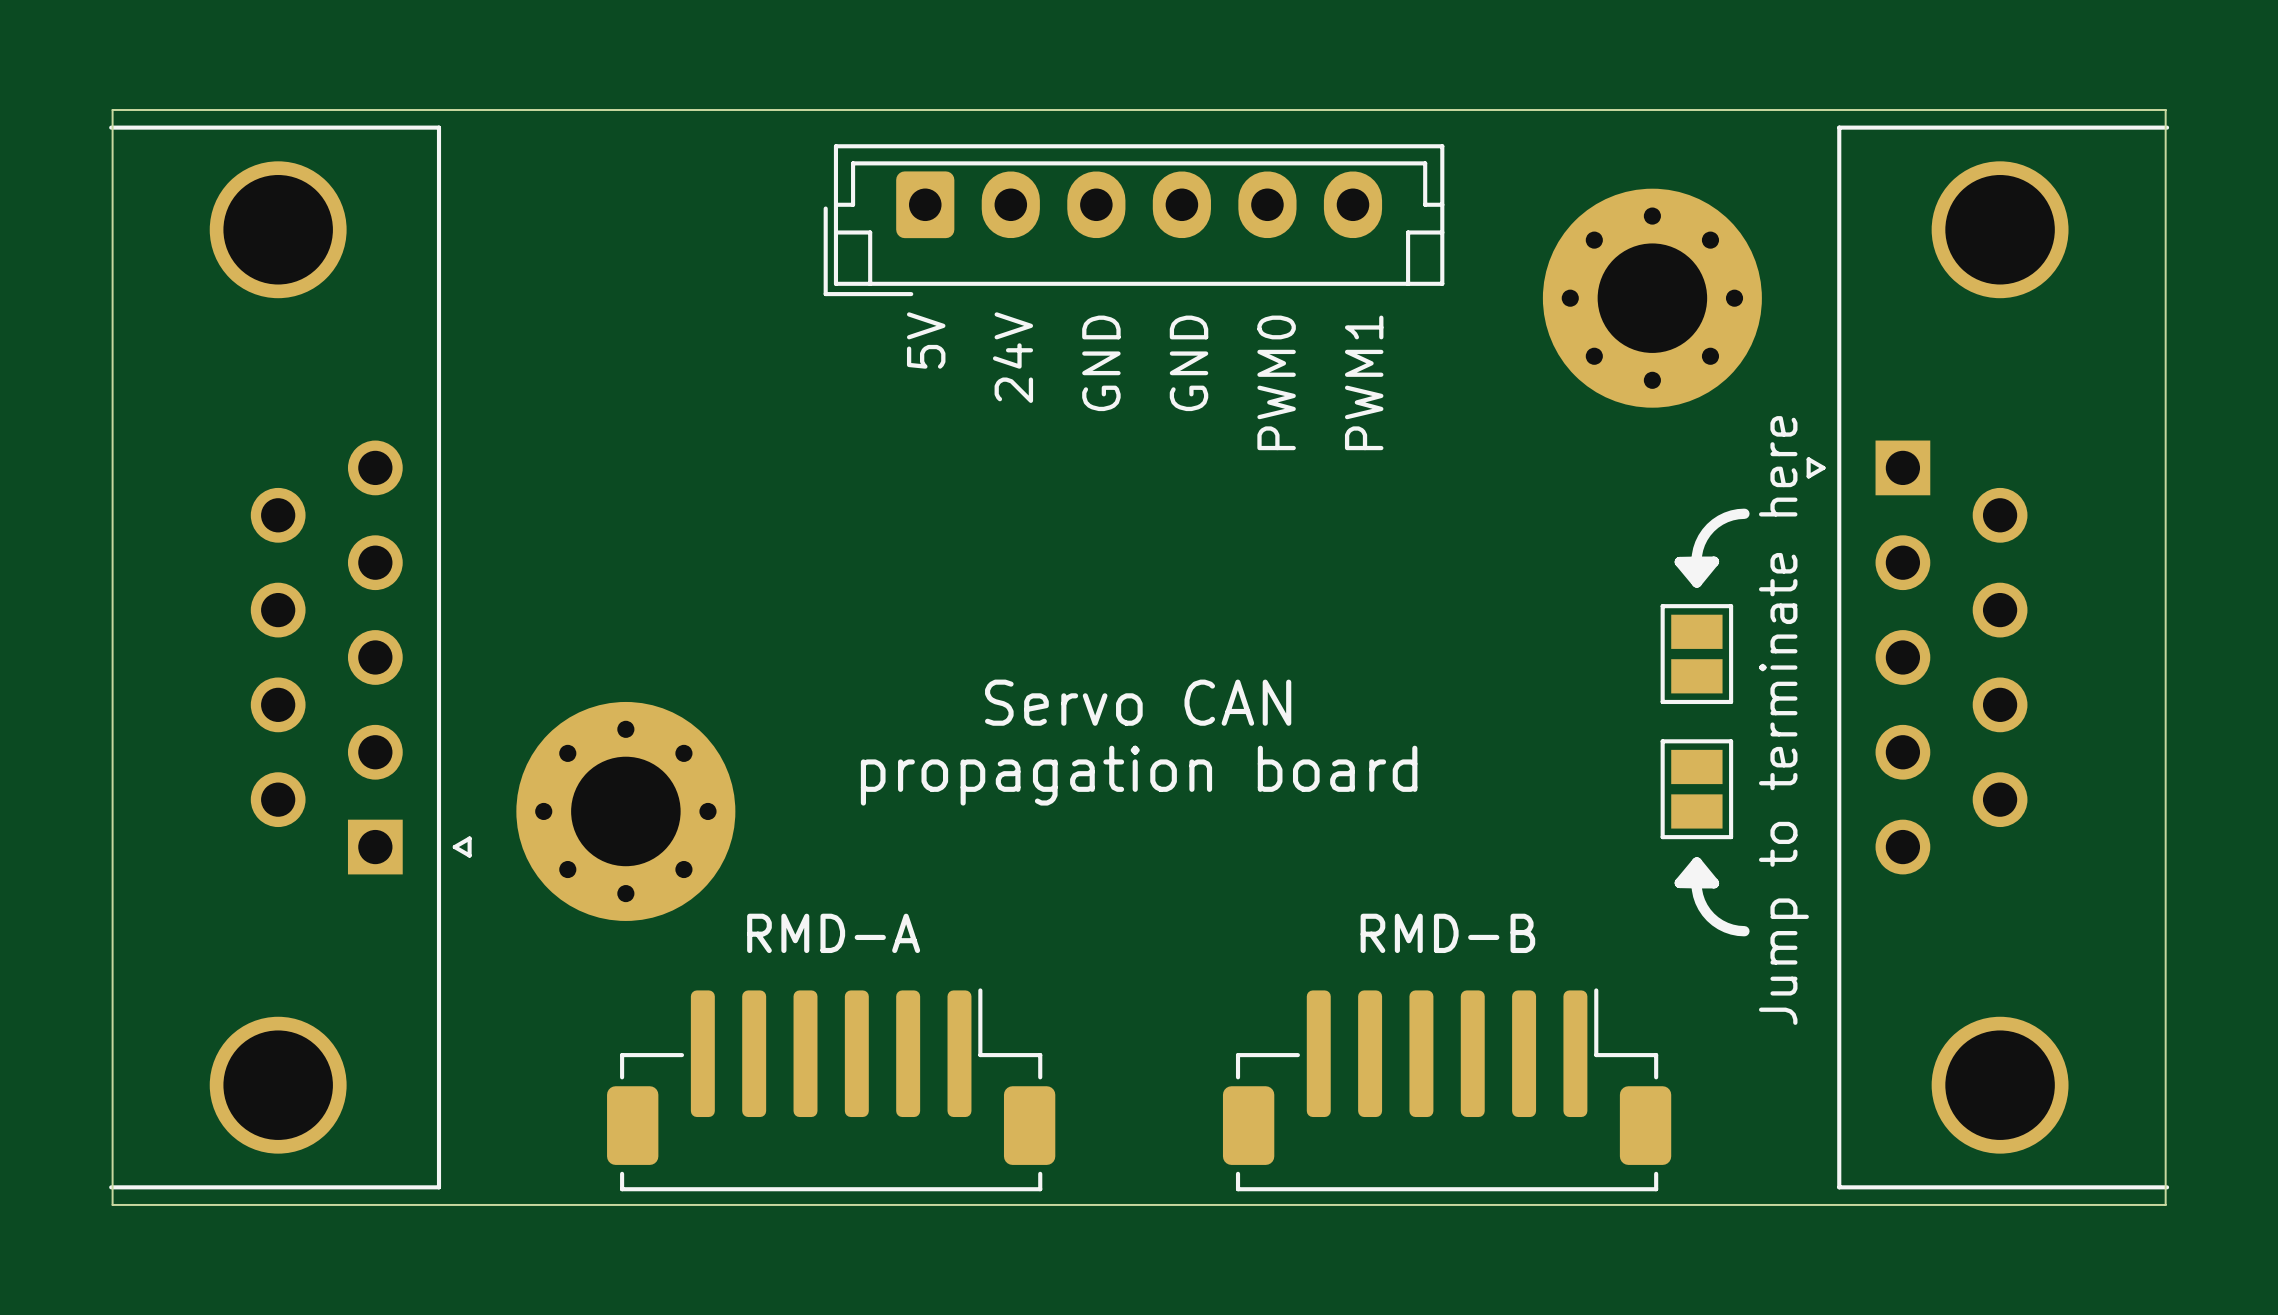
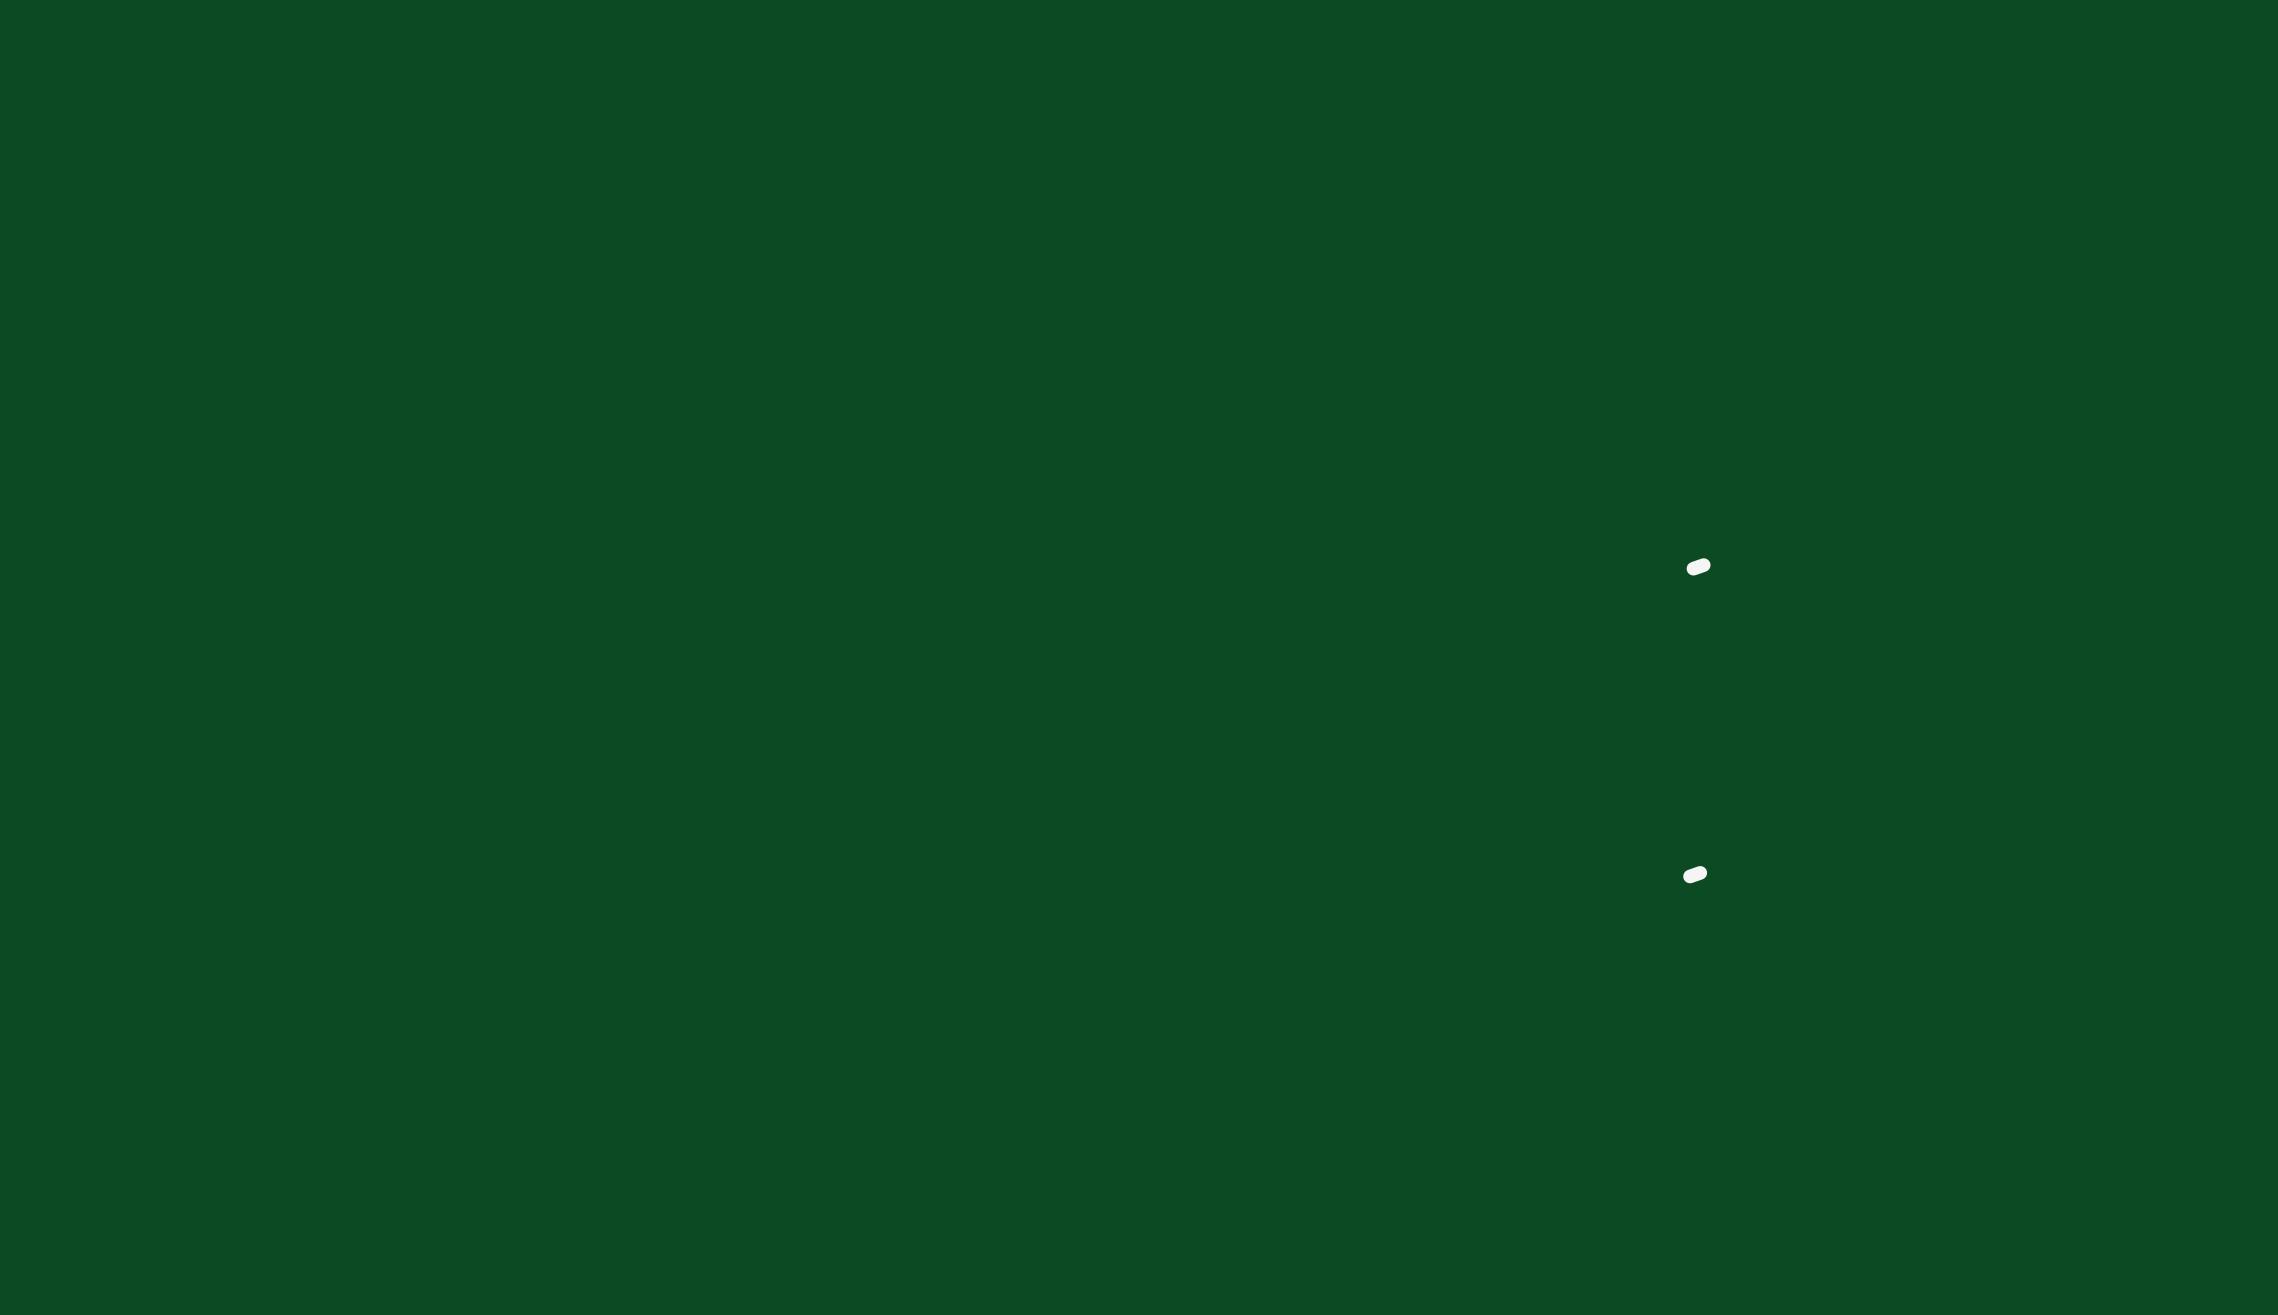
board edge: (112, 109) (2165, 109) (2165, 1204) (112, 1204) (112, 109) -> none
part: (1133, 220) -> none
part: (1652, 298) -> none
text: 5V (926, 340) -> none
text: 24V (1012, 357) -> none
text: GND (1101, 363) -> none
text: GND (1189, 363) -> none
text: PWM0 (1276, 382) -> none
text: PWM1 (1364, 382) -> none
line: (1744, 513) (1726, 517) (1710, 527) (1700, 543) (1696, 561) -> none
line: (1696, 561) (1679, 562) (1696, 582) (1713, 561) (1696, 561) -> none
part: (1696, 654) -> none
part: (290, 657) -> none
part: (1987, 657) -> none
text: Servo CAN (1138, 702) -> none
text: Jump to terminate here (1783, 720) -> none
text: propagation board (1139, 775) -> none
part: (1696, 789) -> none
part: (625, 811) -> none
line: (1696, 883) (1713, 883) (1696, 862) (1679, 882) (1696, 883) -> none
line: (1696, 883) (1700, 901) (1710, 917) (1726, 927) (1744, 931) -> none
RMD-A: (831, 1089) -> none
RMD-B: (1447, 1089) -> none

